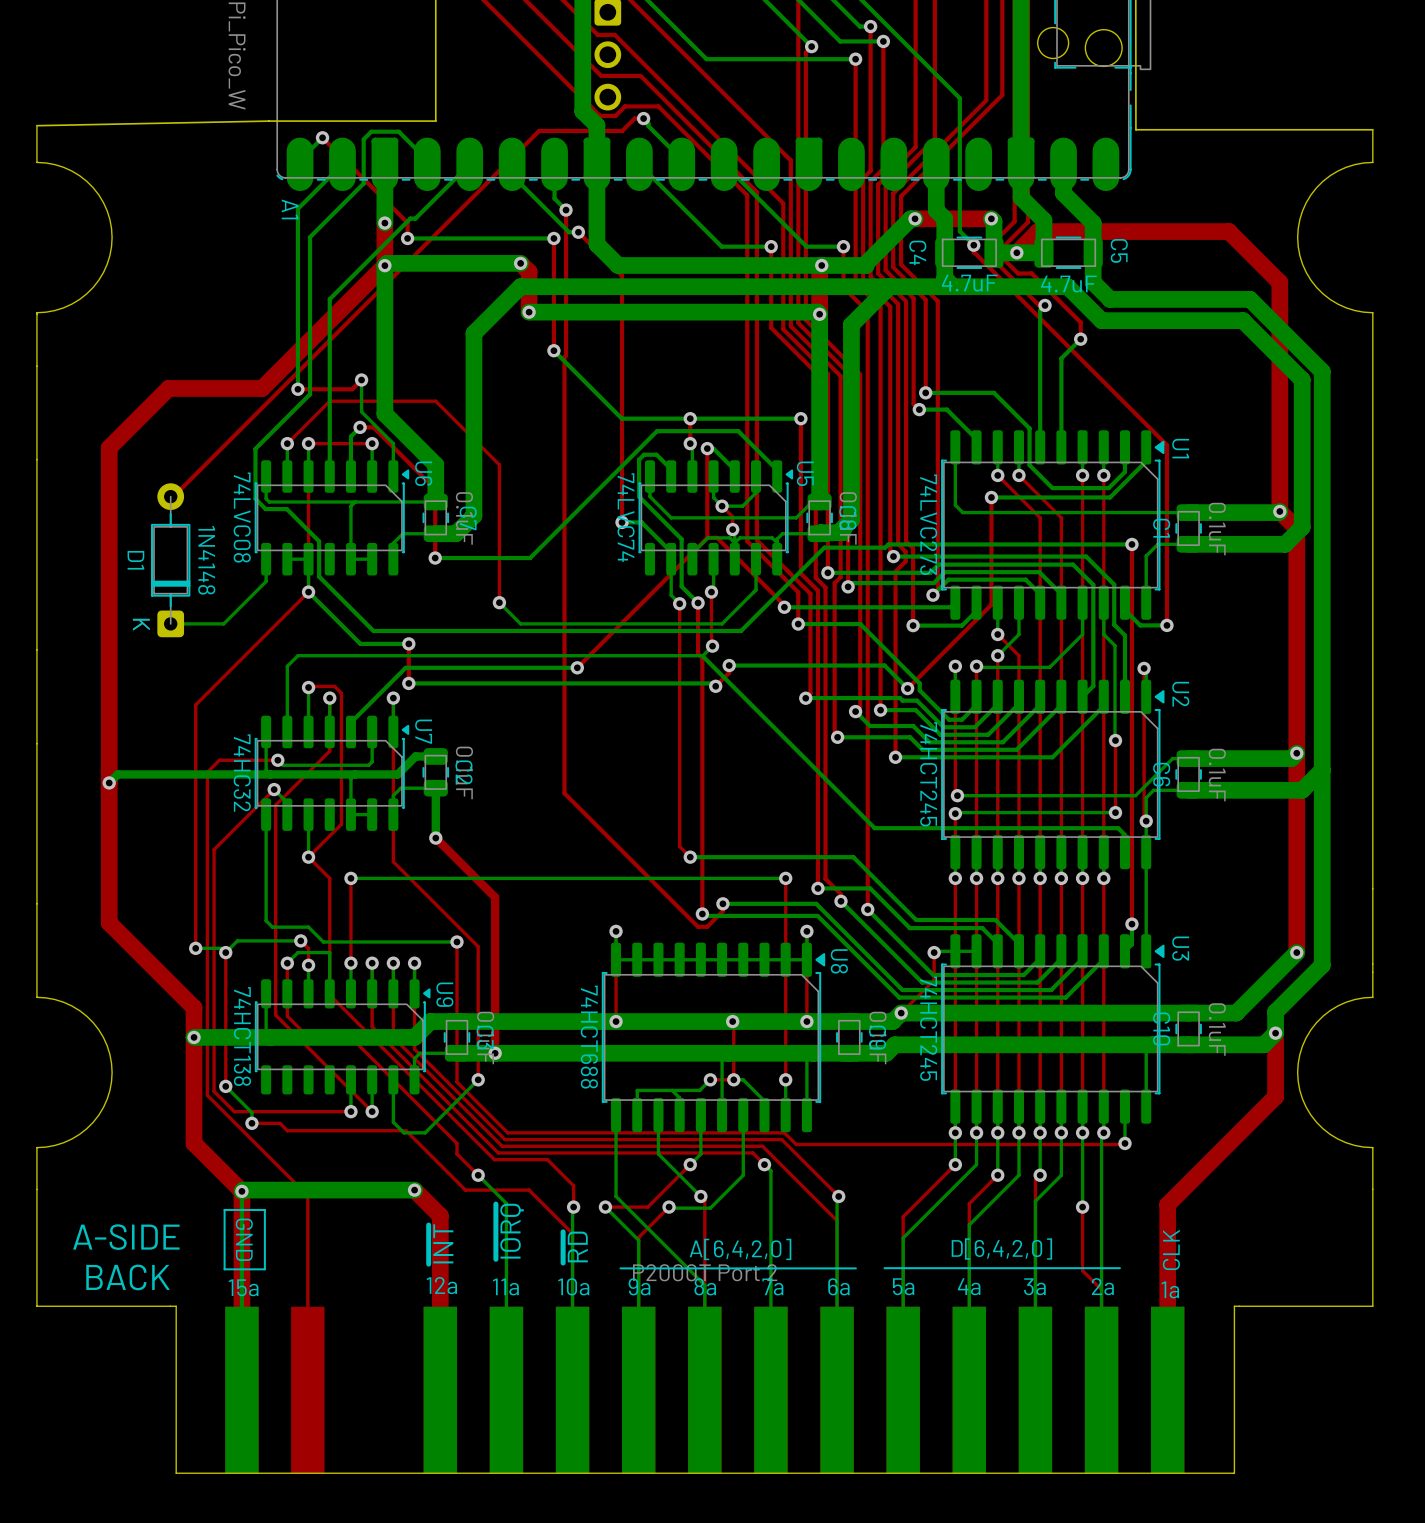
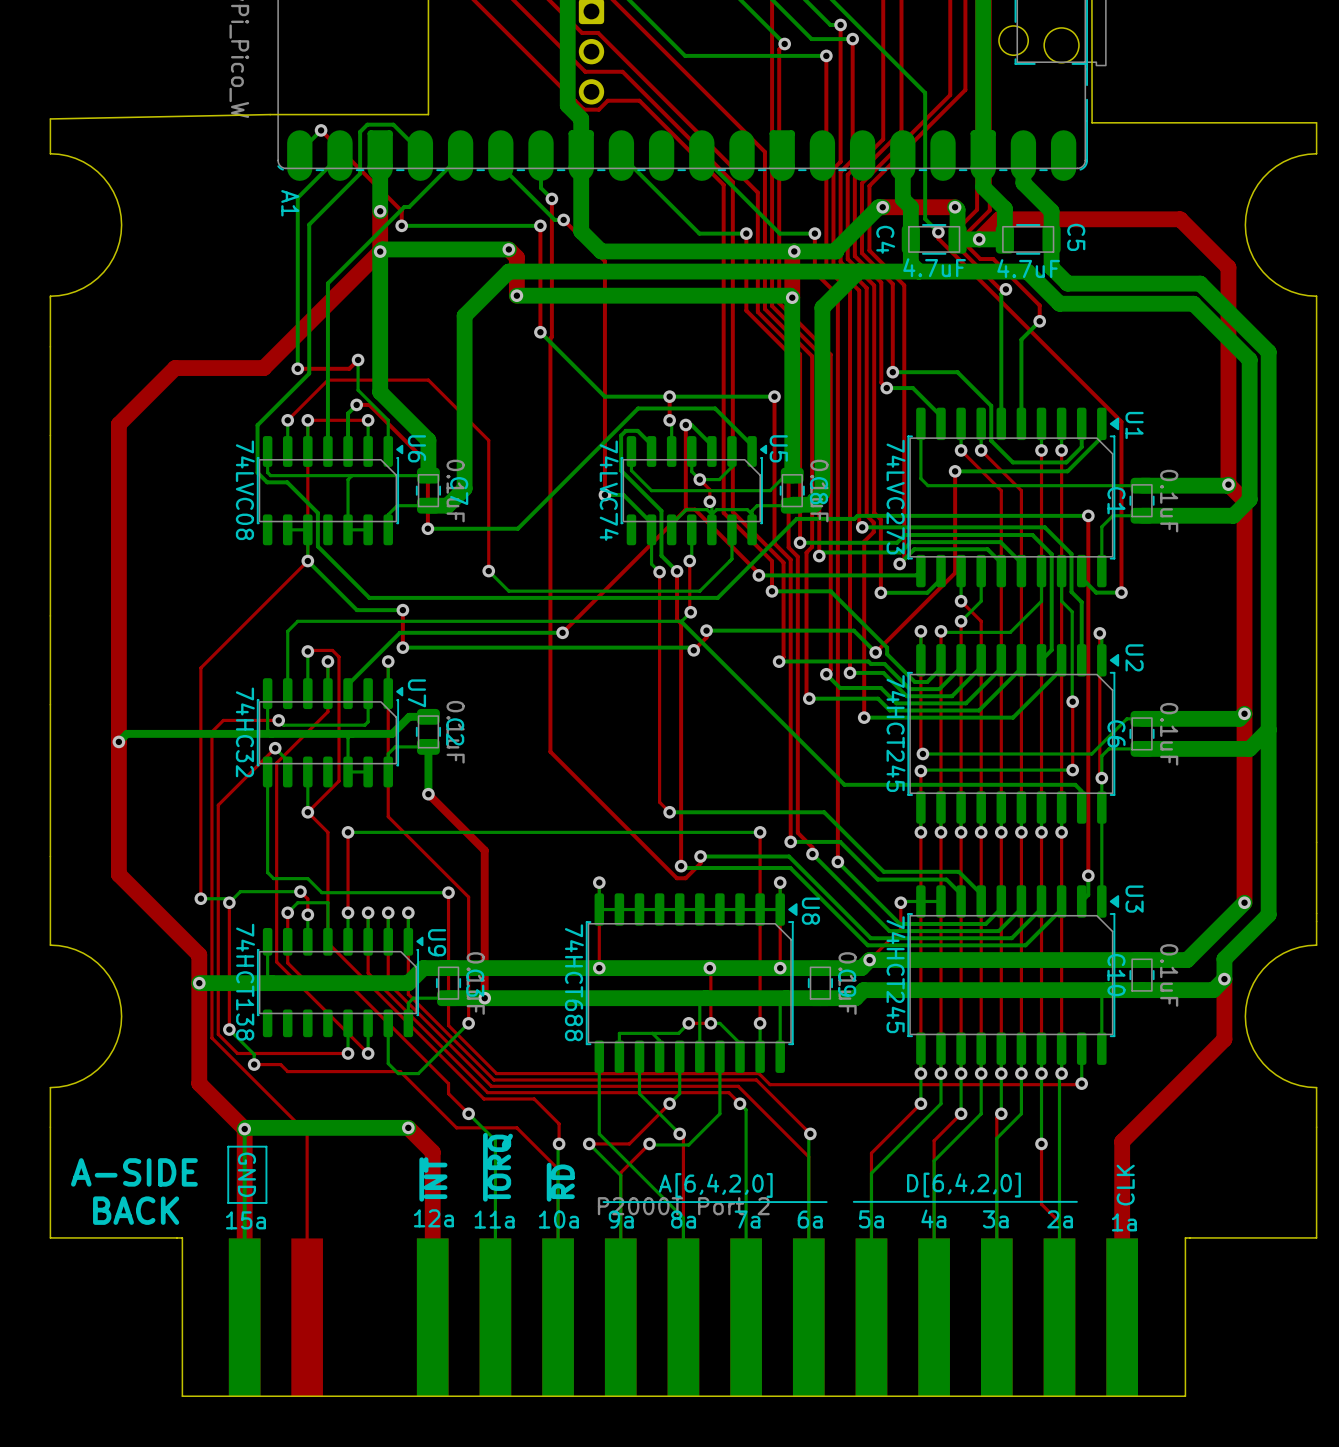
top track: (643, 118) (634, 118) (622, 130) (539, 130) (173, 496) (170, 496) -> none
bottom track: (643, 118) (648, 126) (681, 159) -> none
via: (643, 118) -> none
bottom track: (266, 559) (266, 581) (223, 623) (170, 623) -> none
D1: 1N4148 (170, 560) -> none

